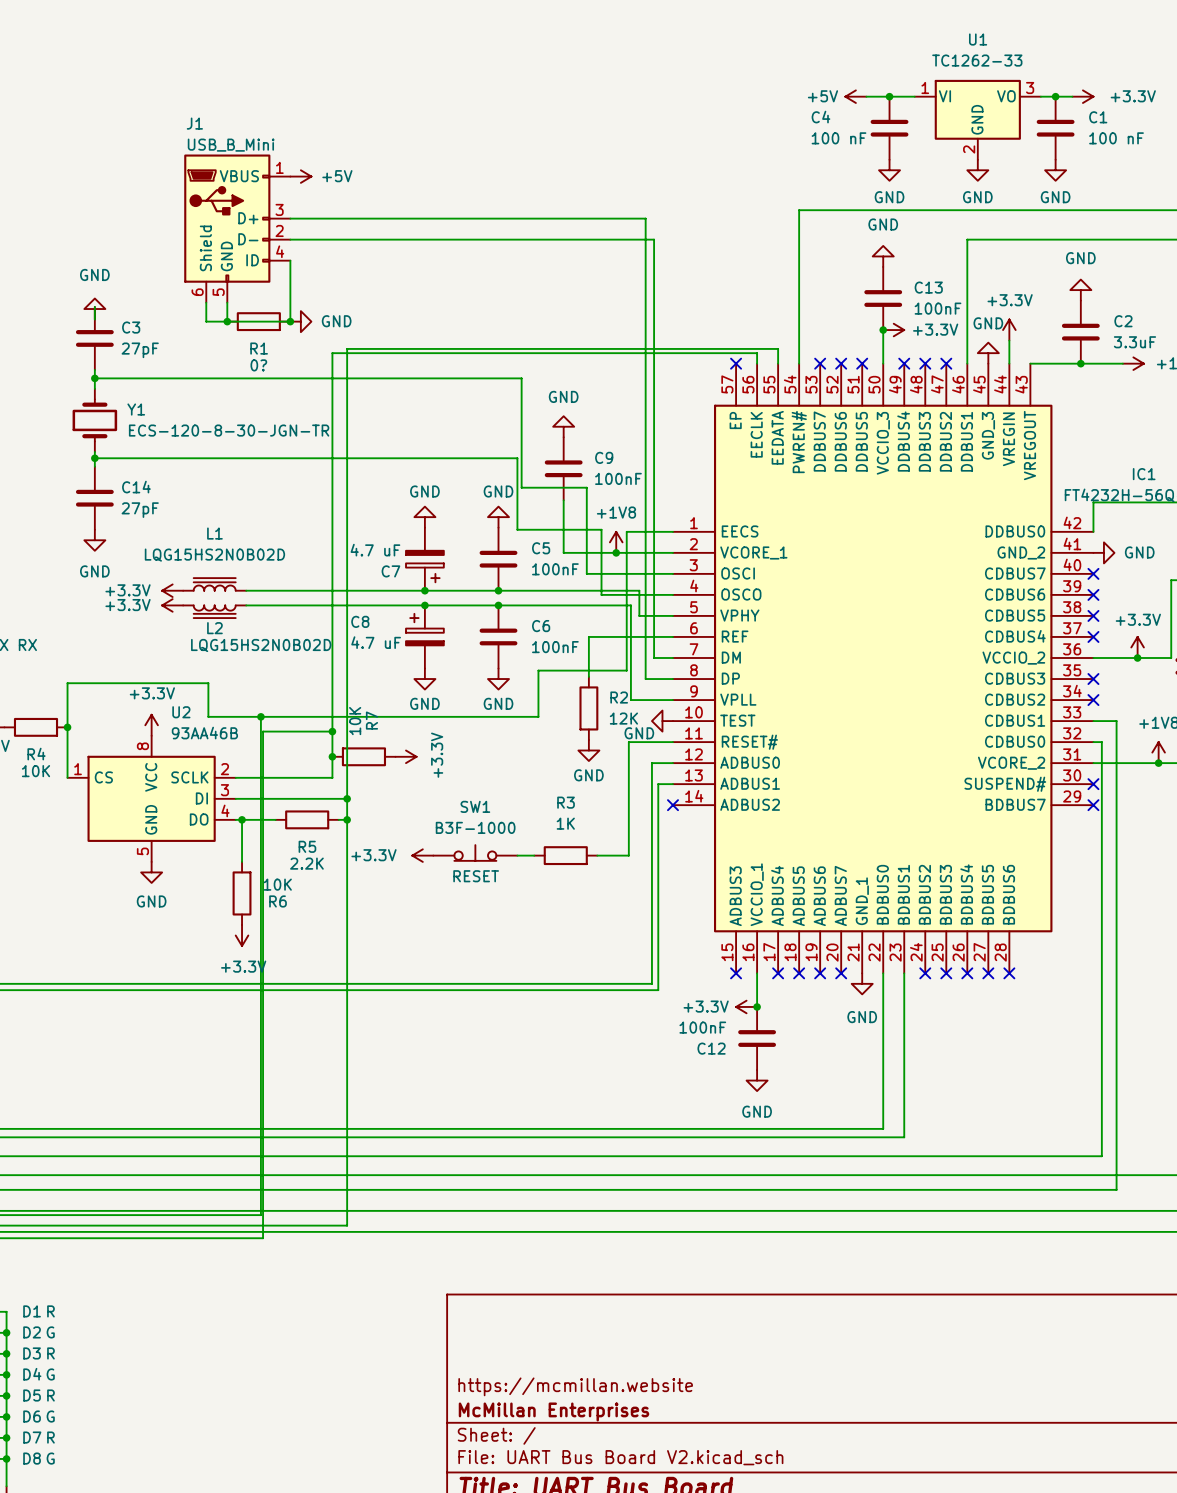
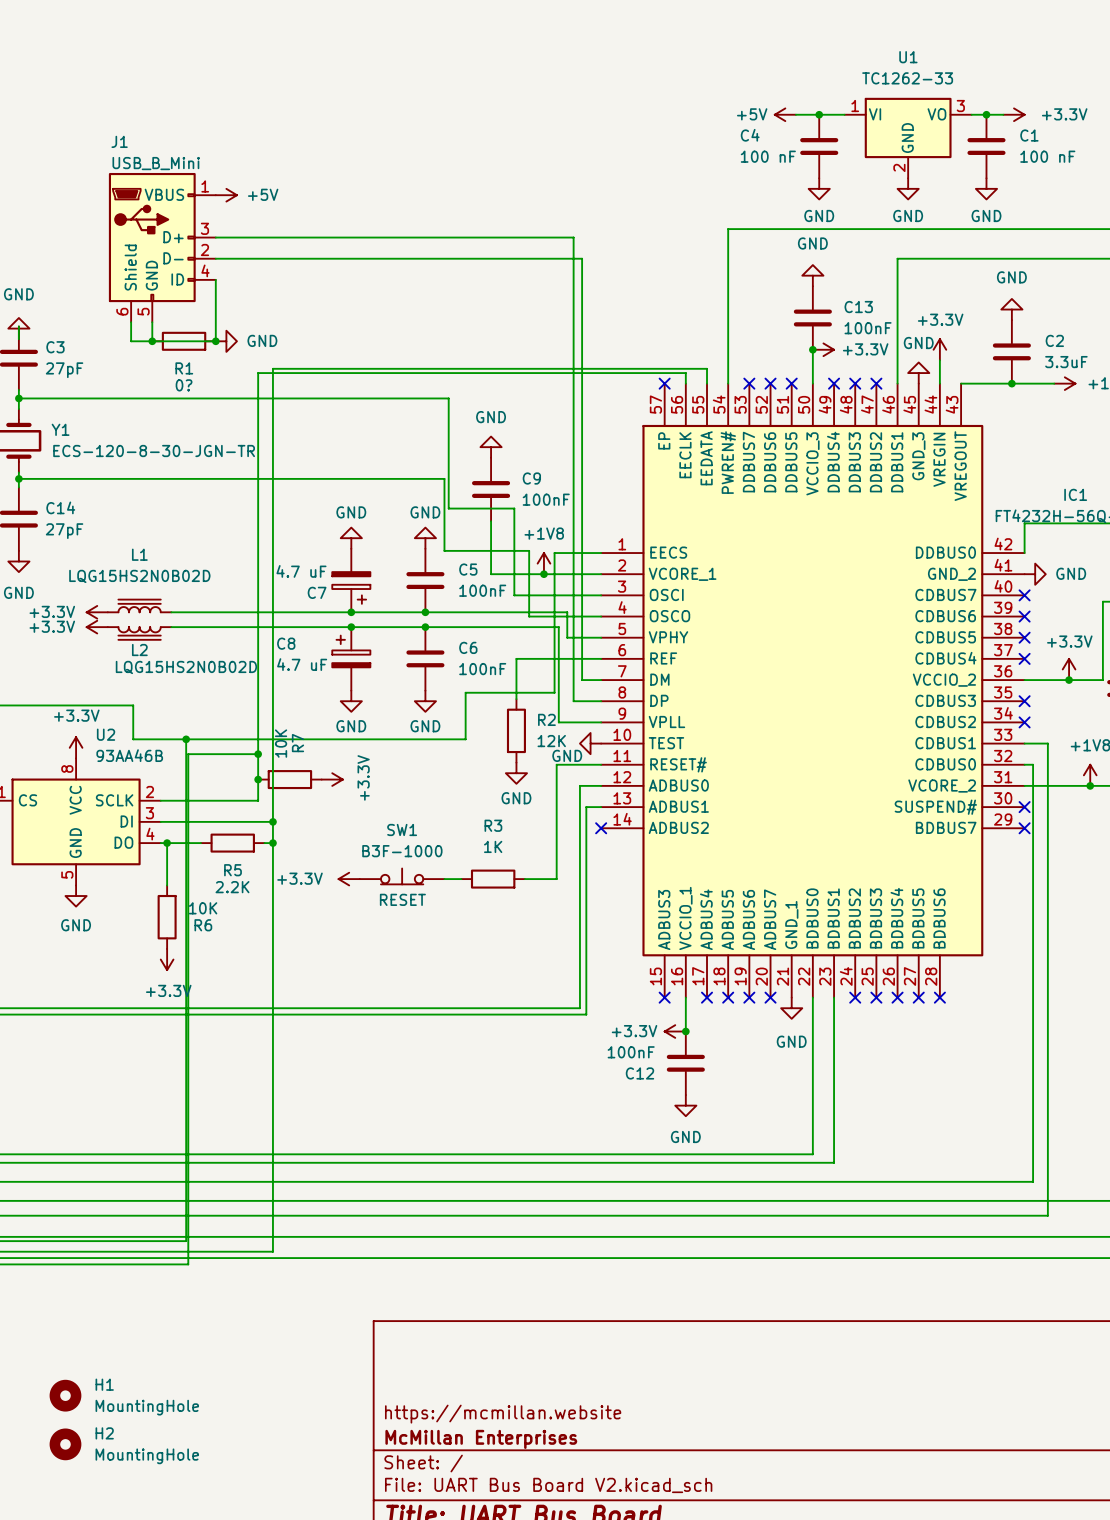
H1: none -> MountingHole (65, 1395)
H2: none -> MountingHole (65, 1444)

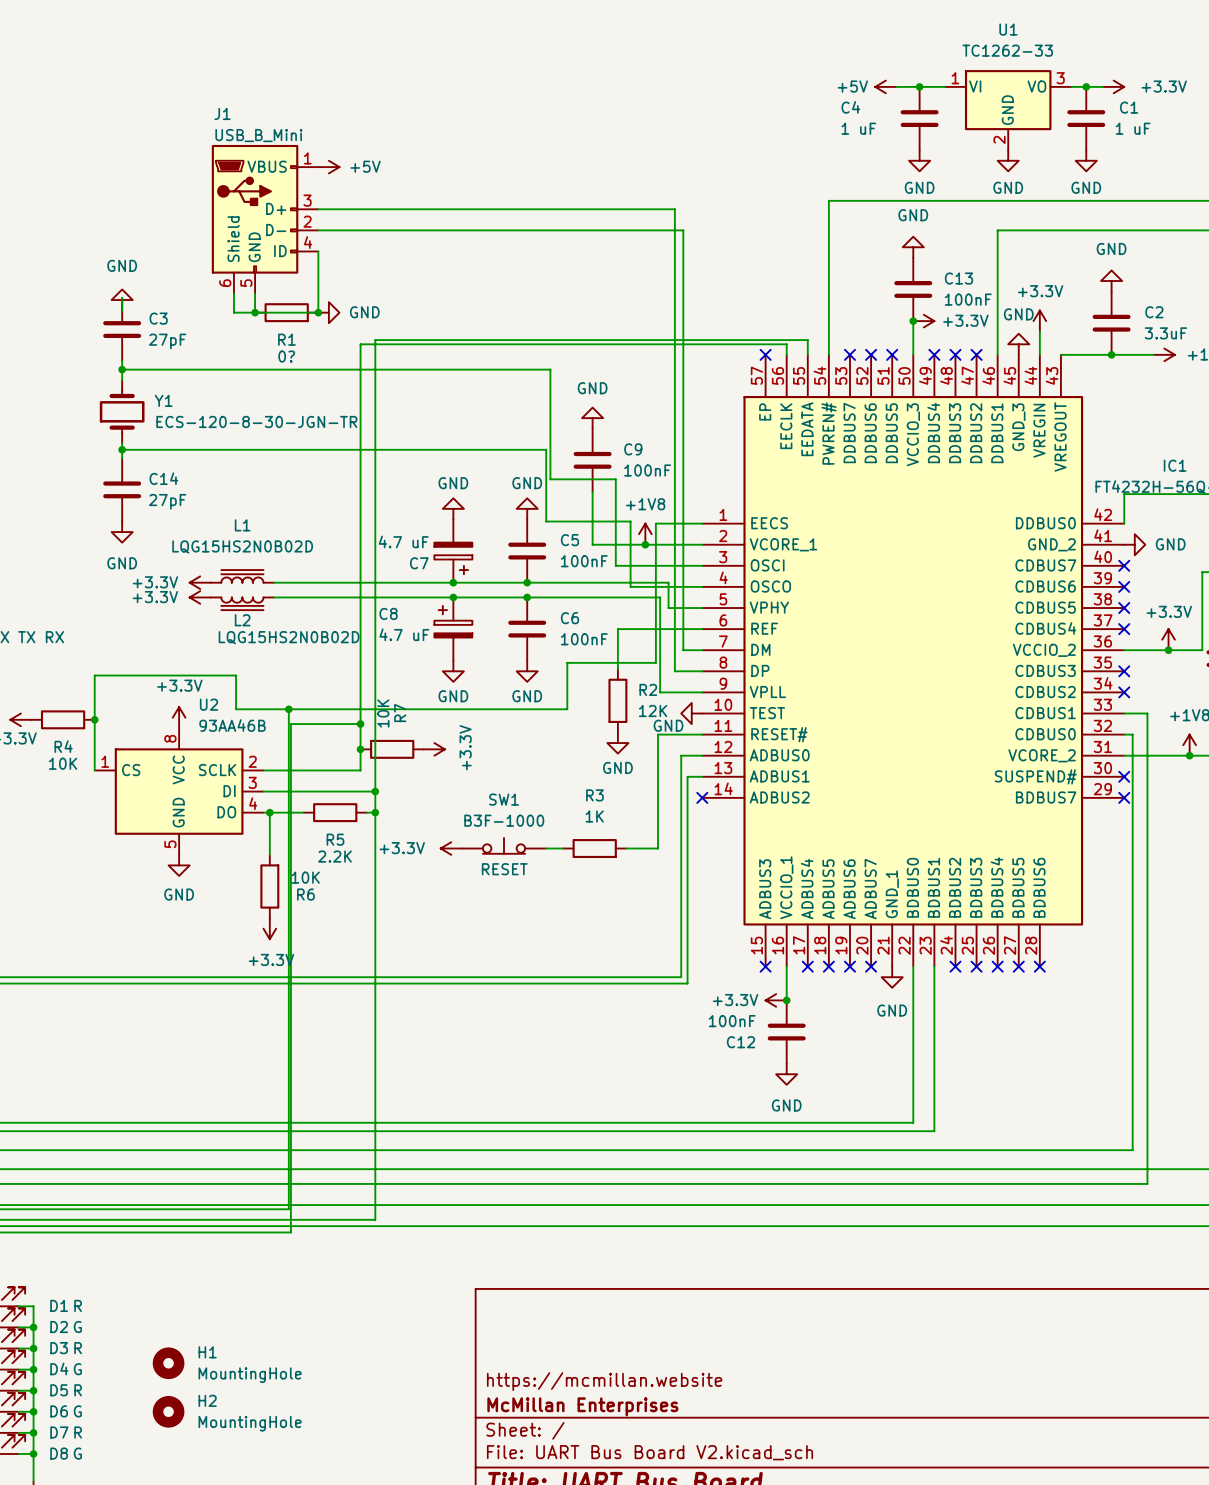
C4 value: 100 nF (768, 156) -> 1 uF (858, 128)
C1 value: 100 nF (1047, 156) -> 1 uF (1133, 128)

